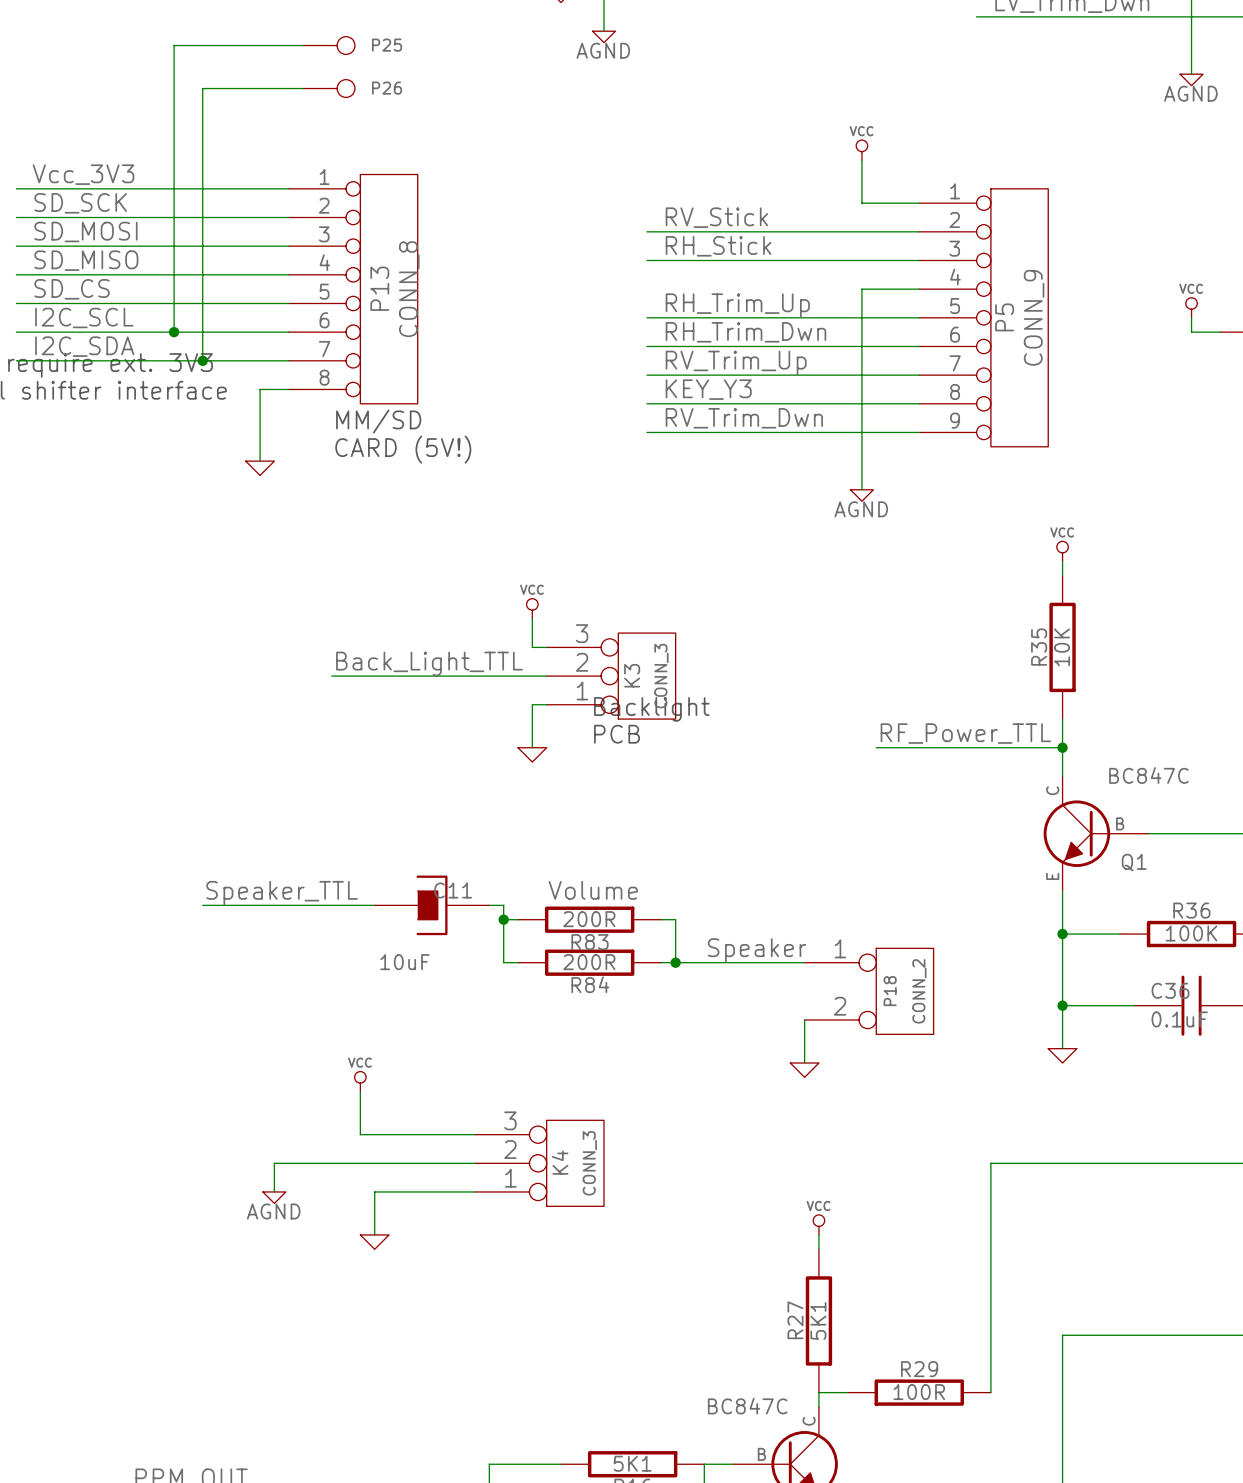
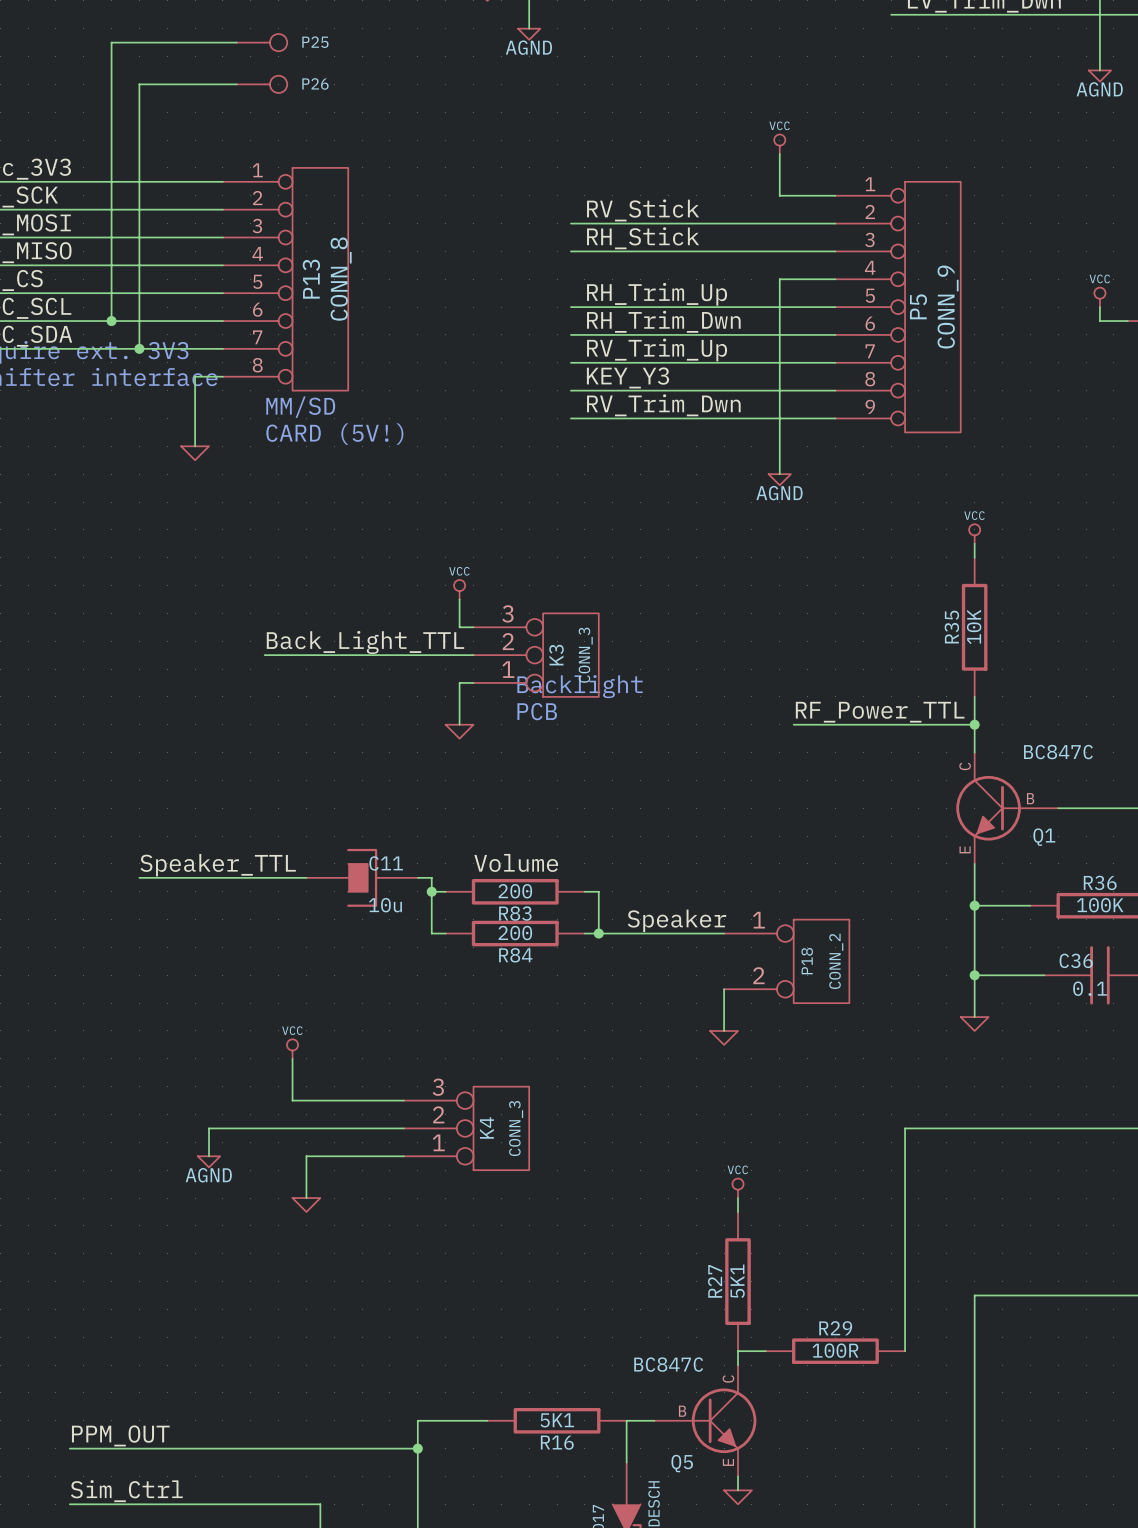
R83 value: 200R (589, 919) -> 200 (515, 891)
C11 value: 10uF (404, 962) -> 10u (385, 905)
R84 value: 200R (589, 962) -> 200 (515, 933)
C36 value: 0.1uF (1179, 1019) -> 0.1 (1090, 988)

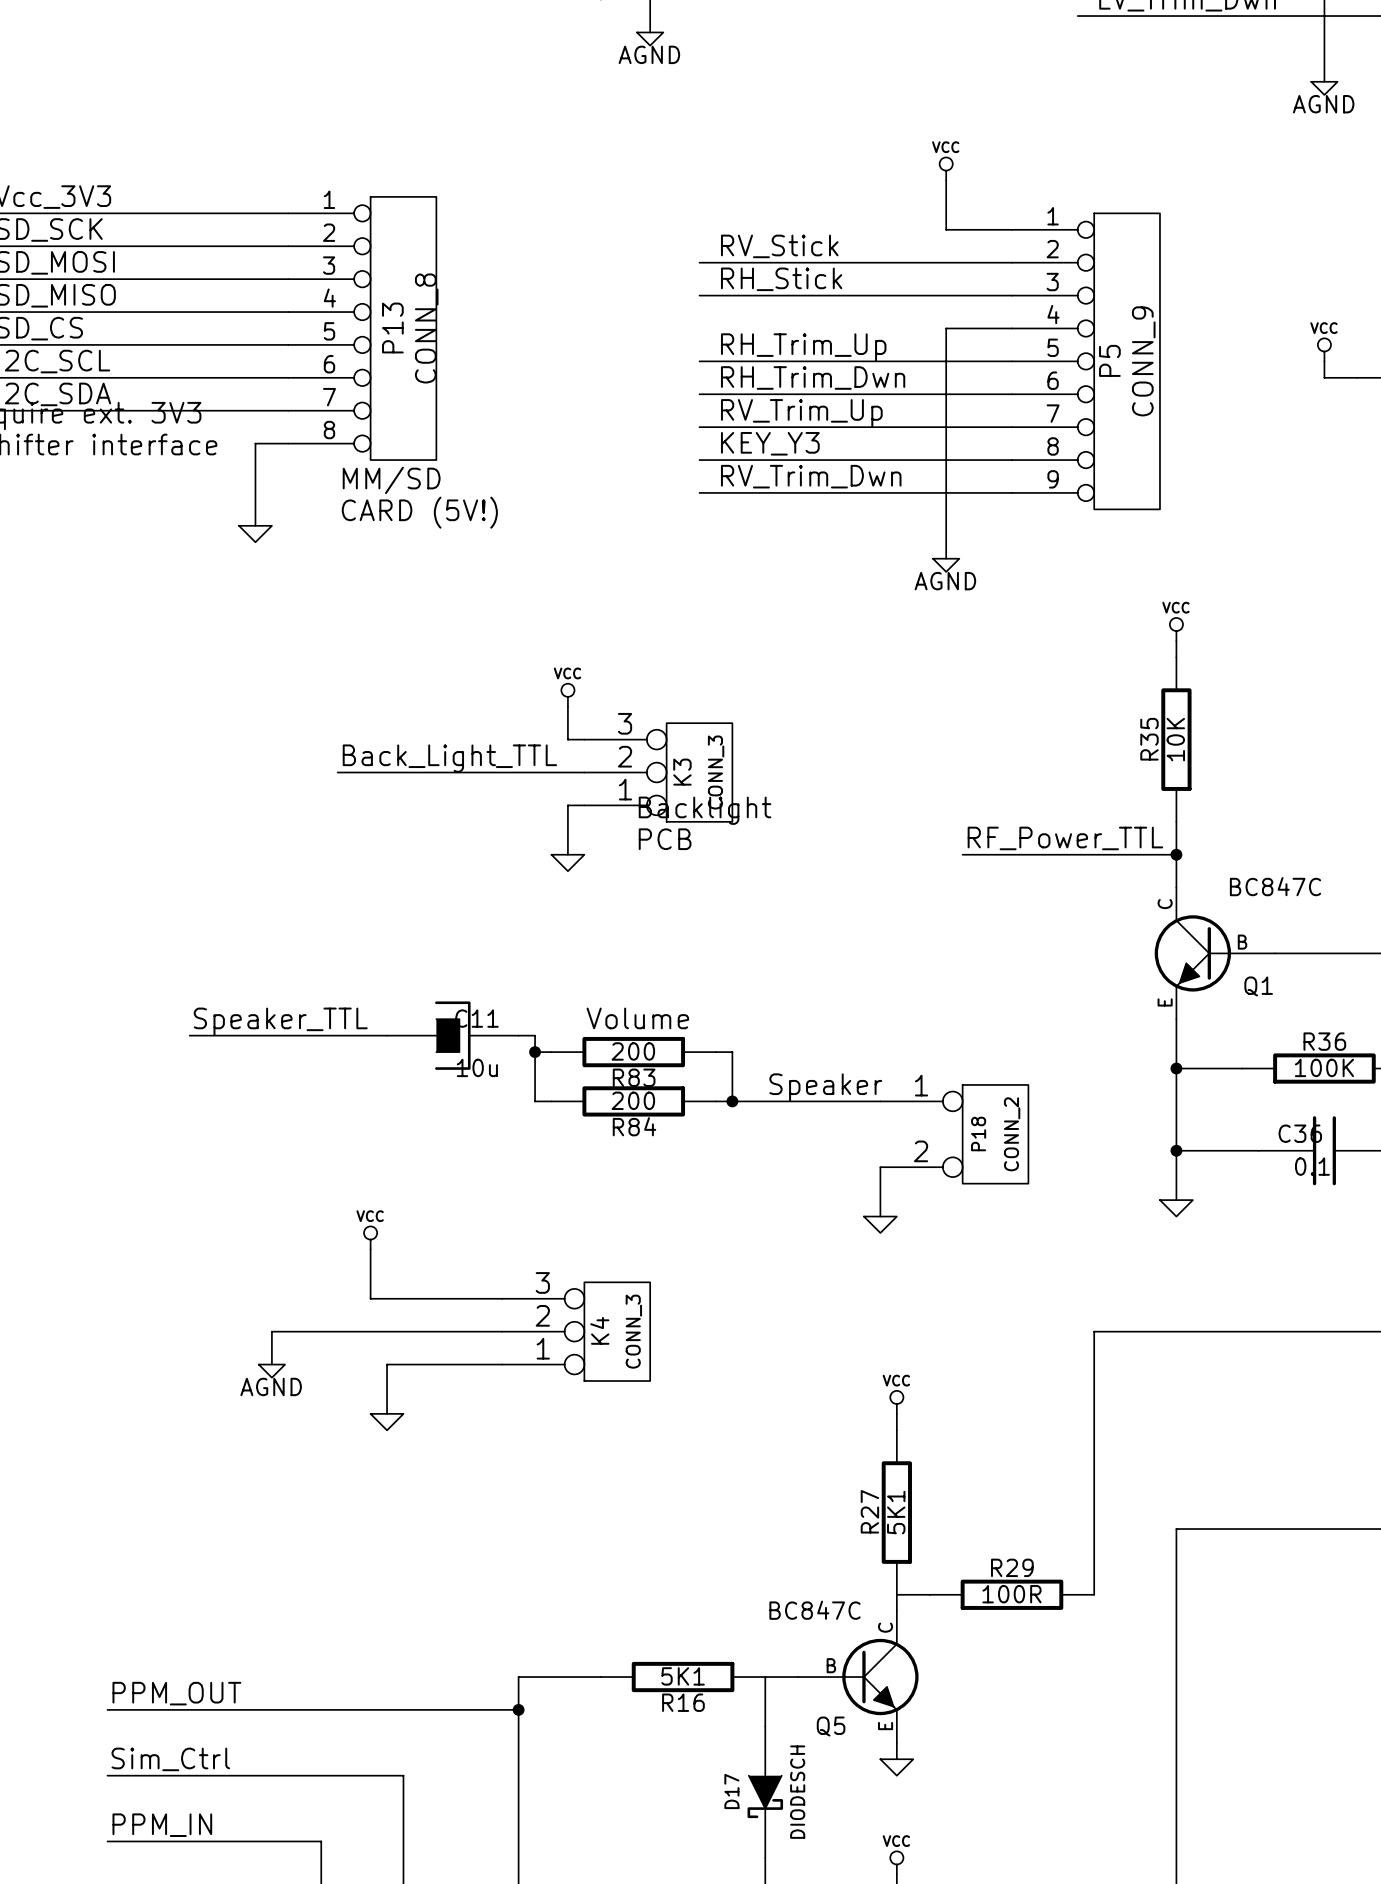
wire: (236, 42) (111, 42) (111, 321) -> none
P25: (262, 42) -> none
wire: (236, 84) (139, 84) (139, 348) -> none
P26: (262, 84) -> none
junction: (111, 321) -> none
junction: (139, 348) -> none

